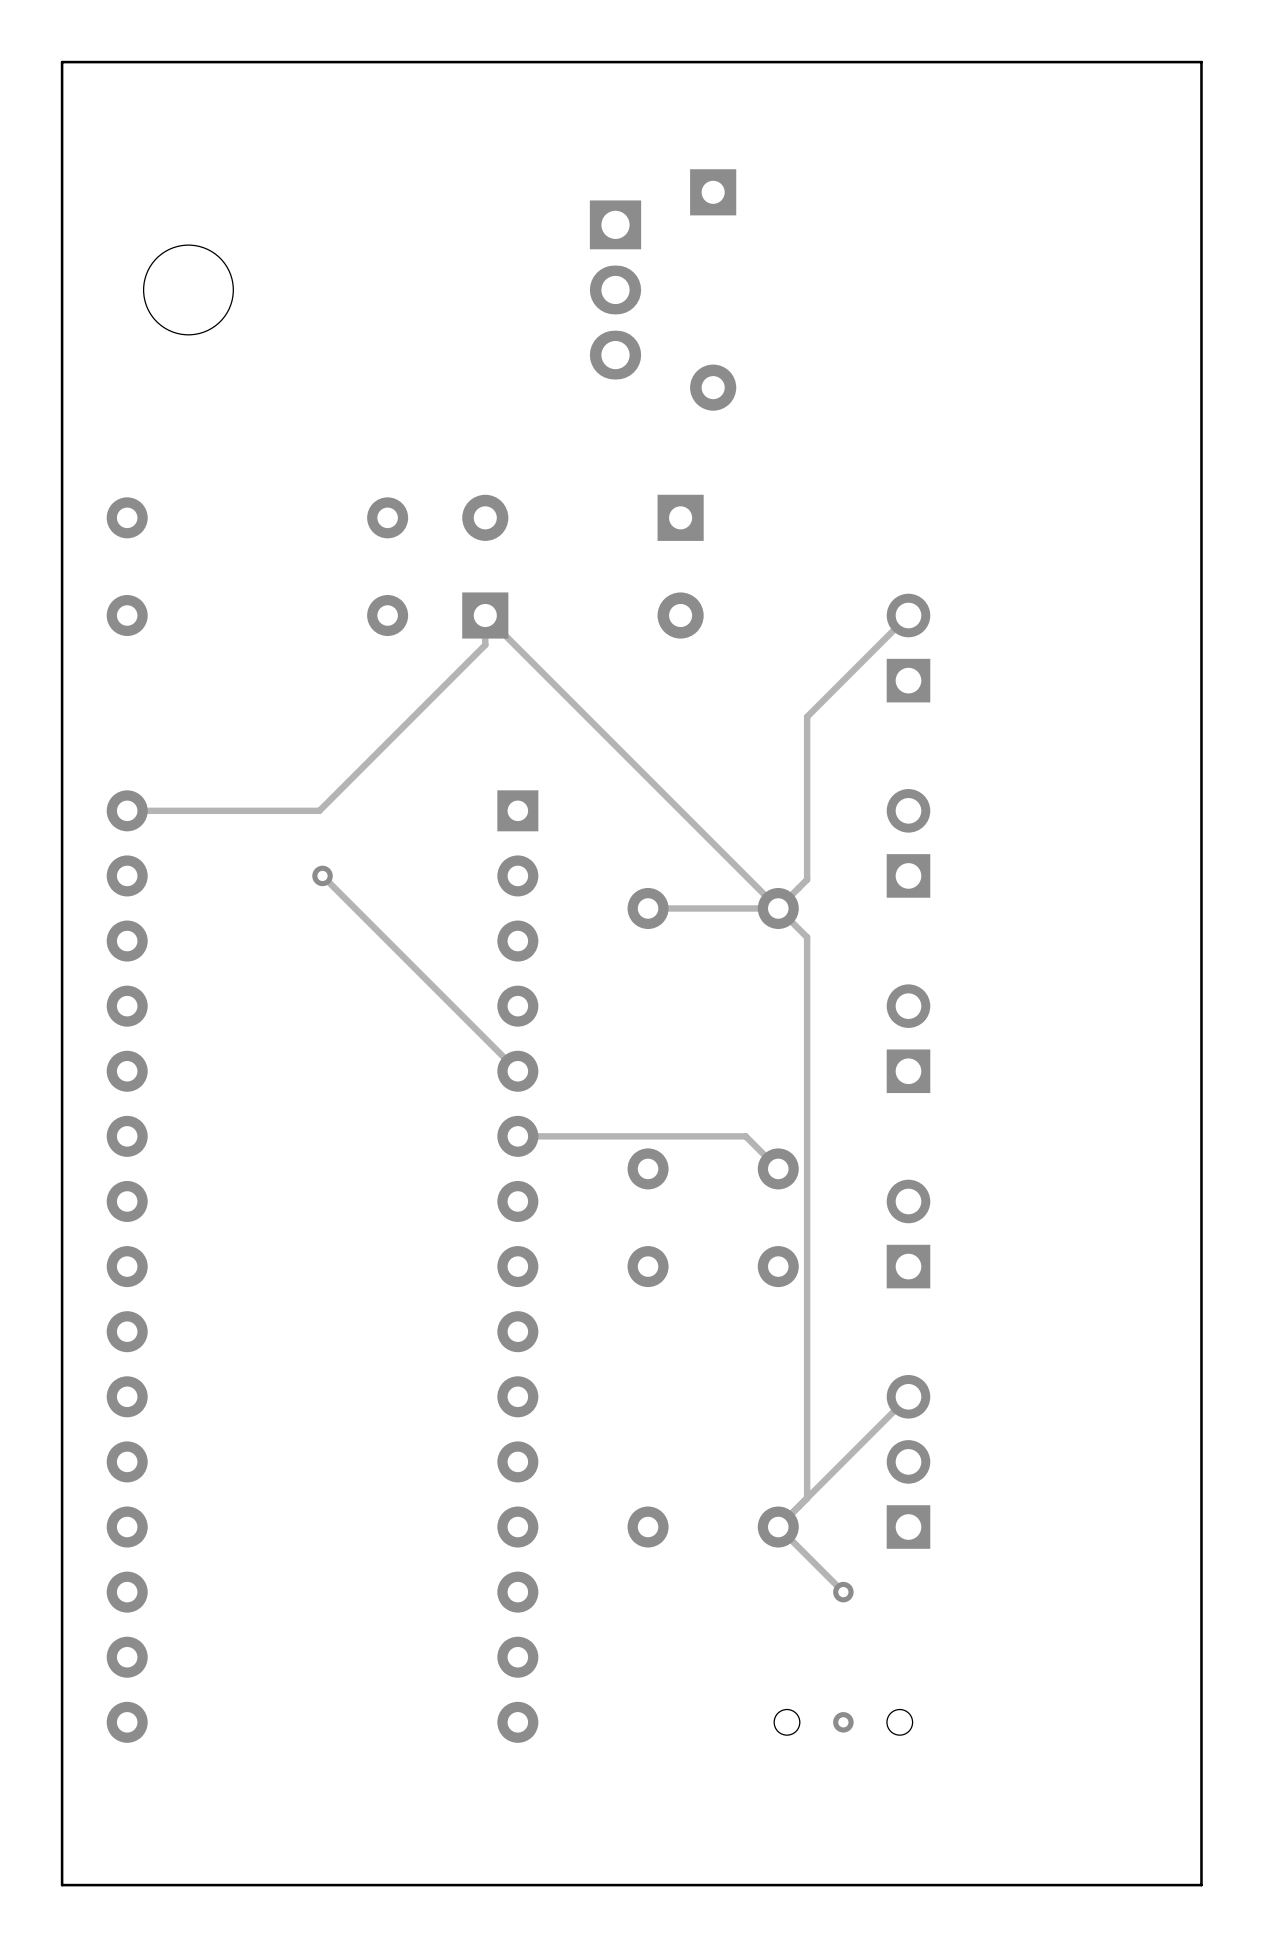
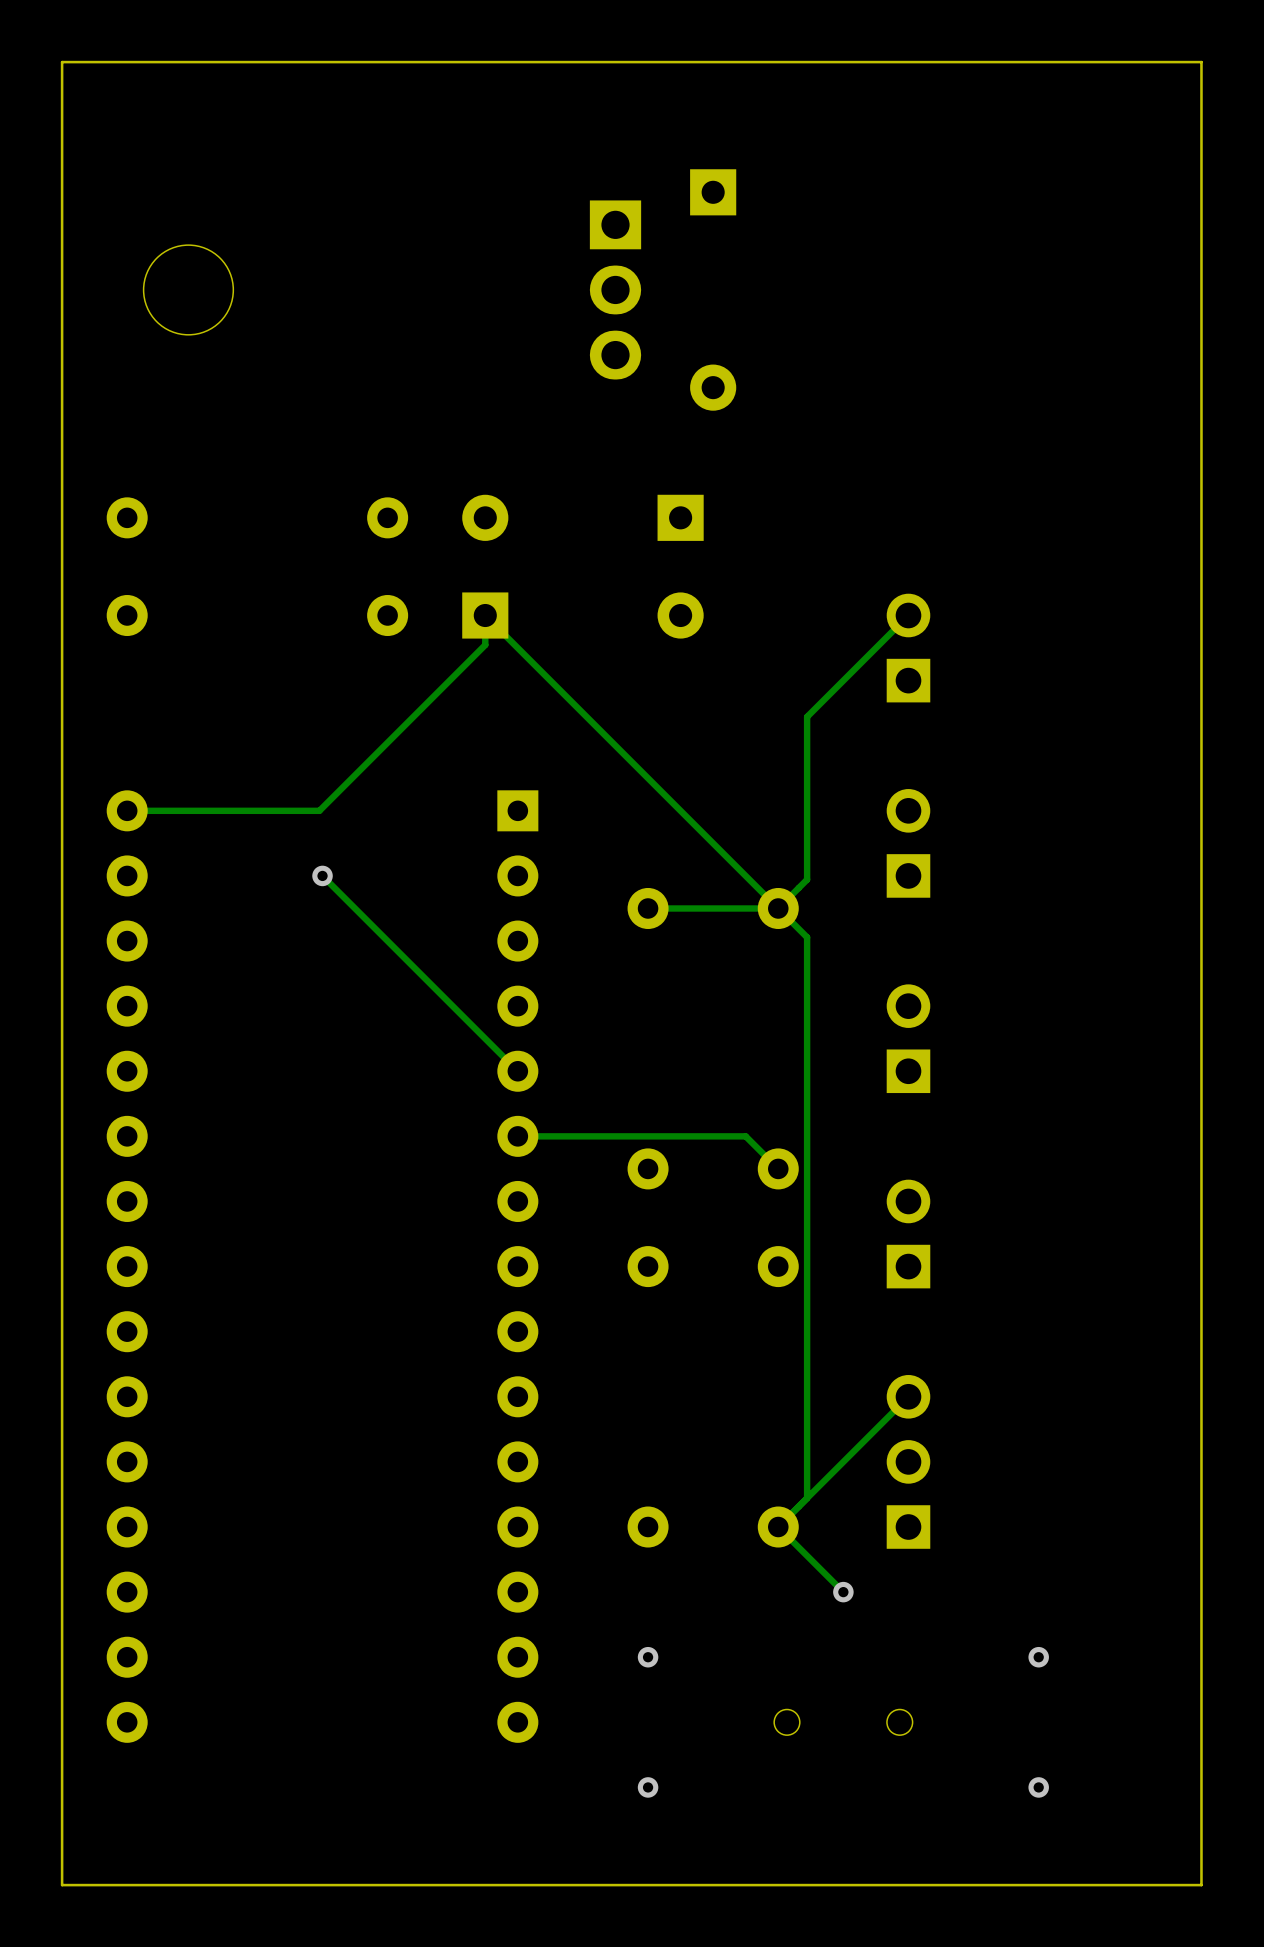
via: none -> (648, 1657)
via: none -> (1038, 1657)
via: (843, 1722) -> none
via: none -> (648, 1787)
via: none -> (1038, 1787)

